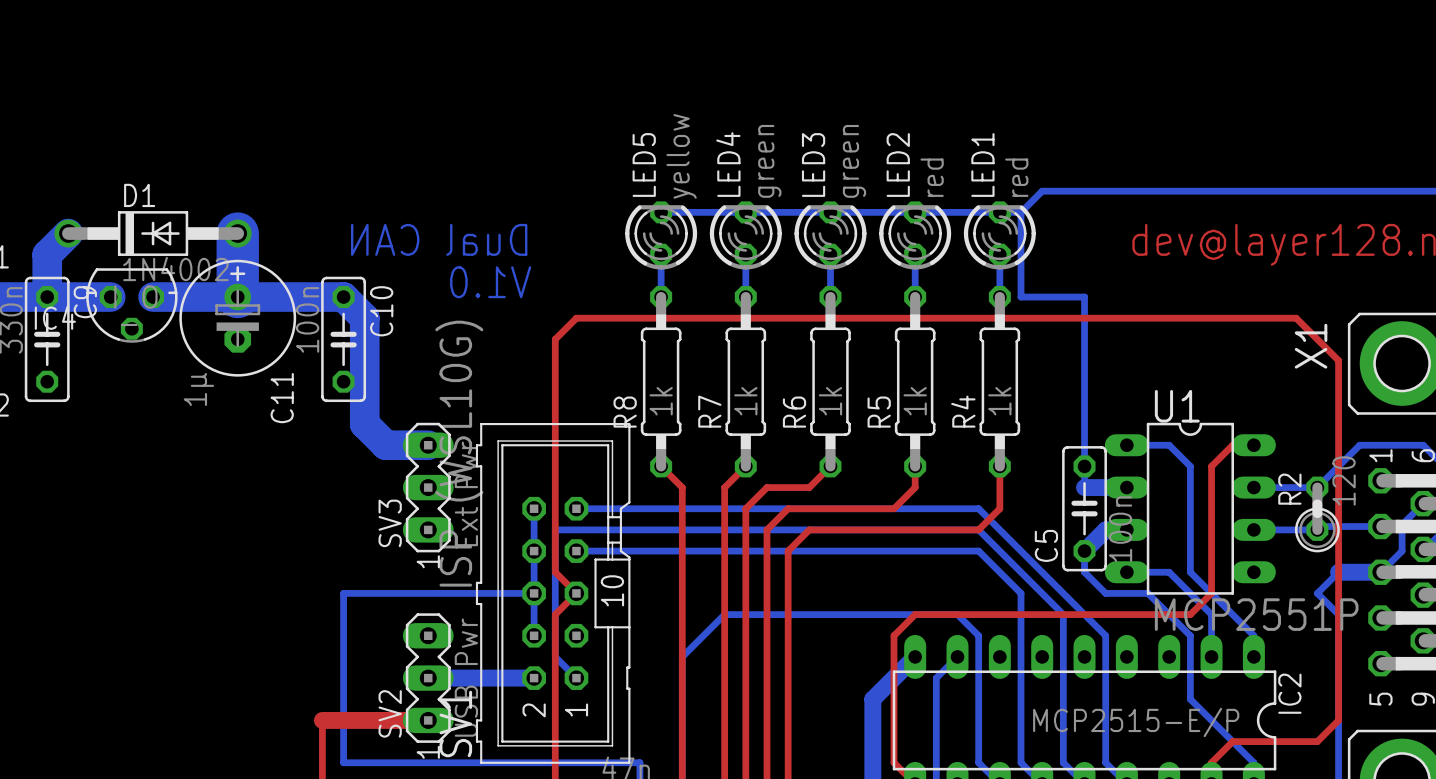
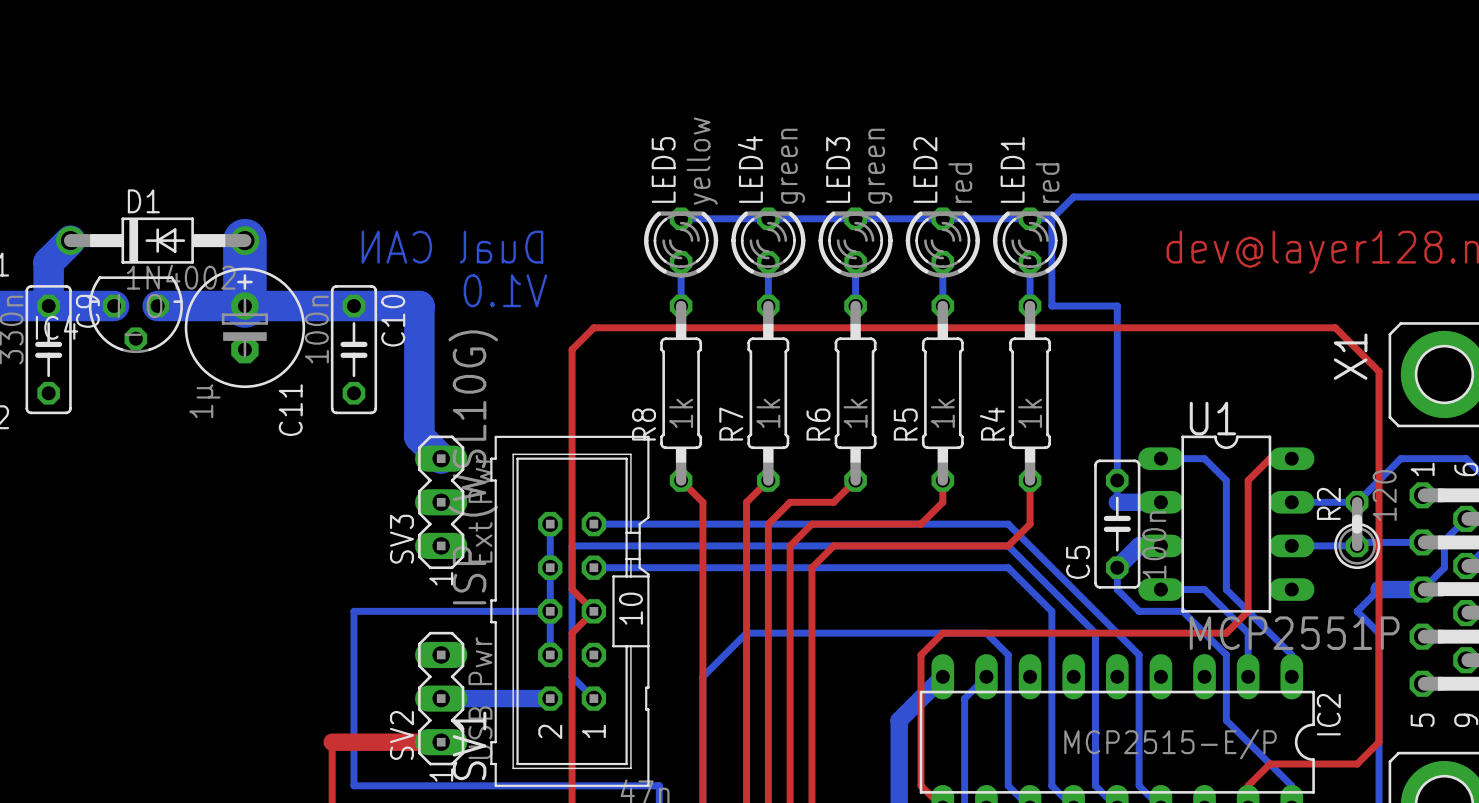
bottom track: (343, 297) (364, 318) (364, 424) (385, 445) (428, 445) -> (353, 306) (419, 306) (419, 436) (441, 458)

